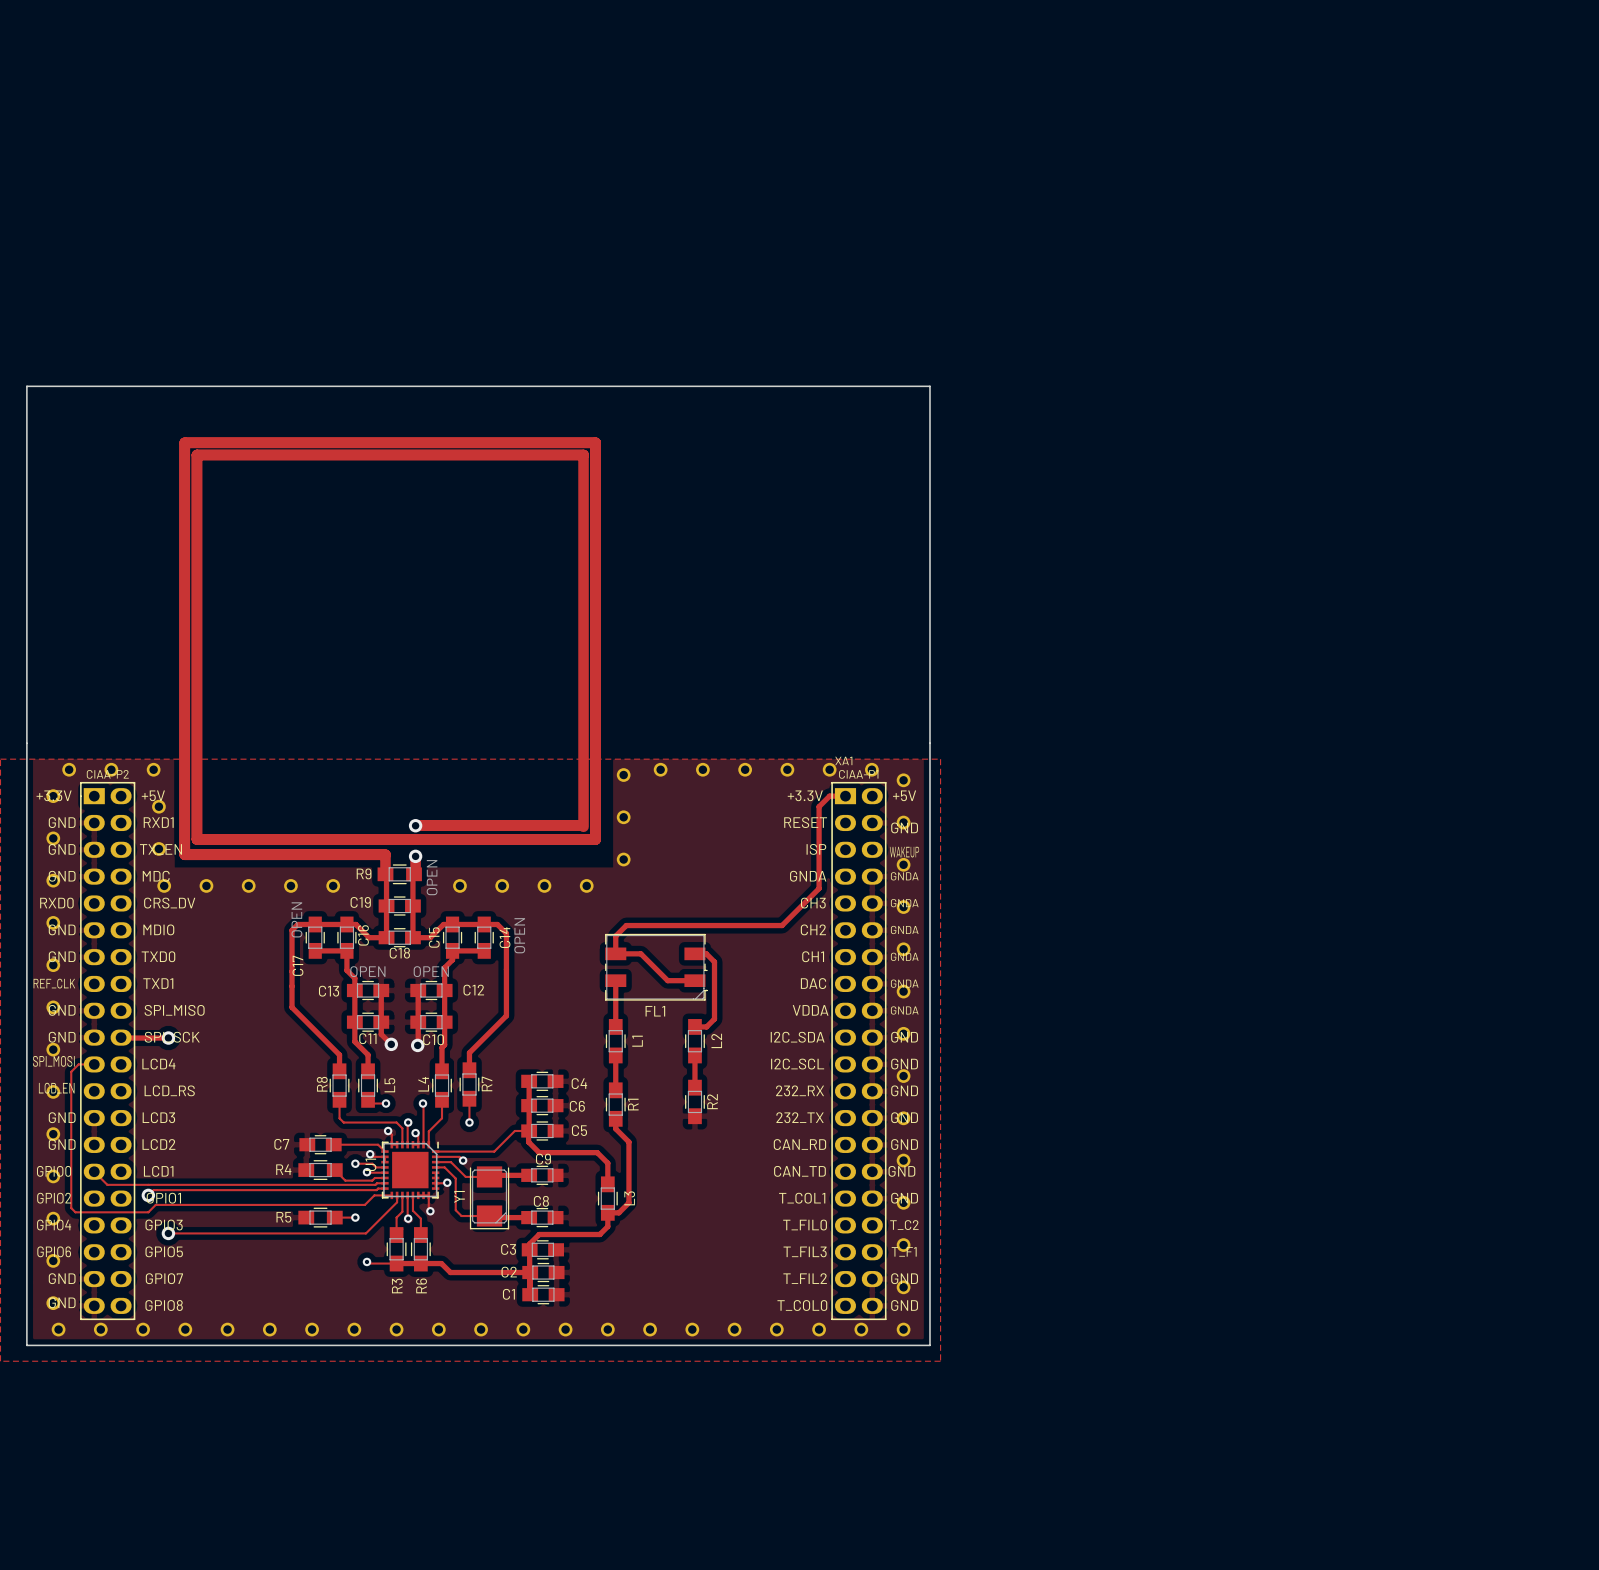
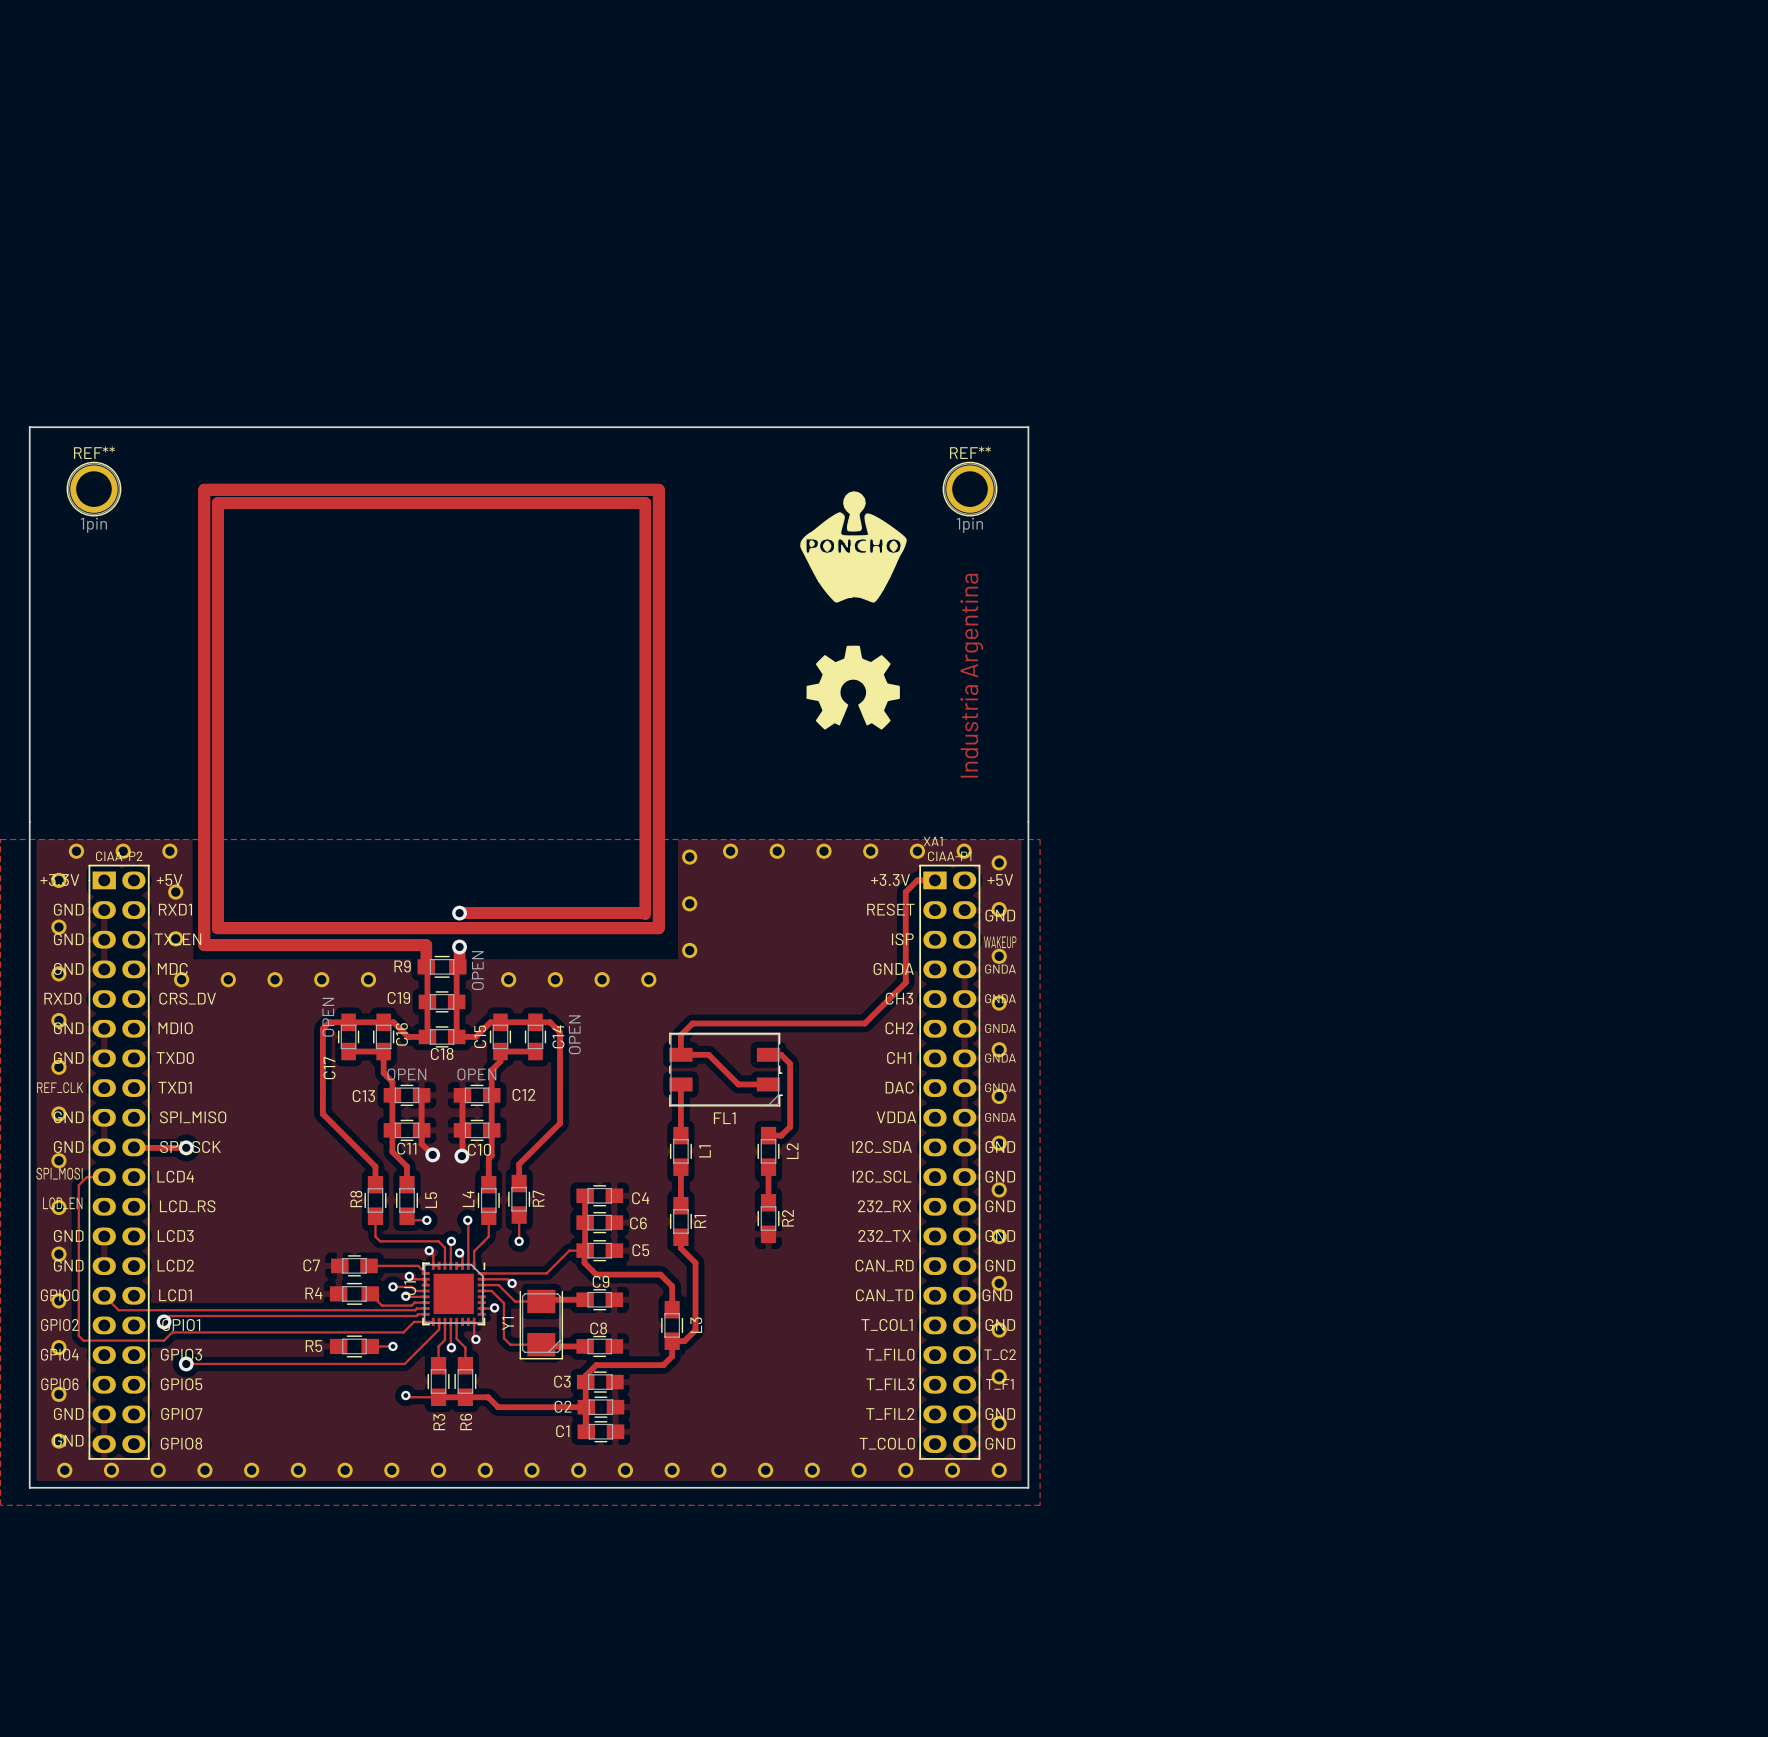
REF**: none -> 1pin (93, 489)
REF**: none -> 1pin (970, 489)
drawing: none -> [800, 491, 907, 603]
drawing: none -> [806, 645, 900, 730]
text: none -> Industria Argentina (971, 675)

